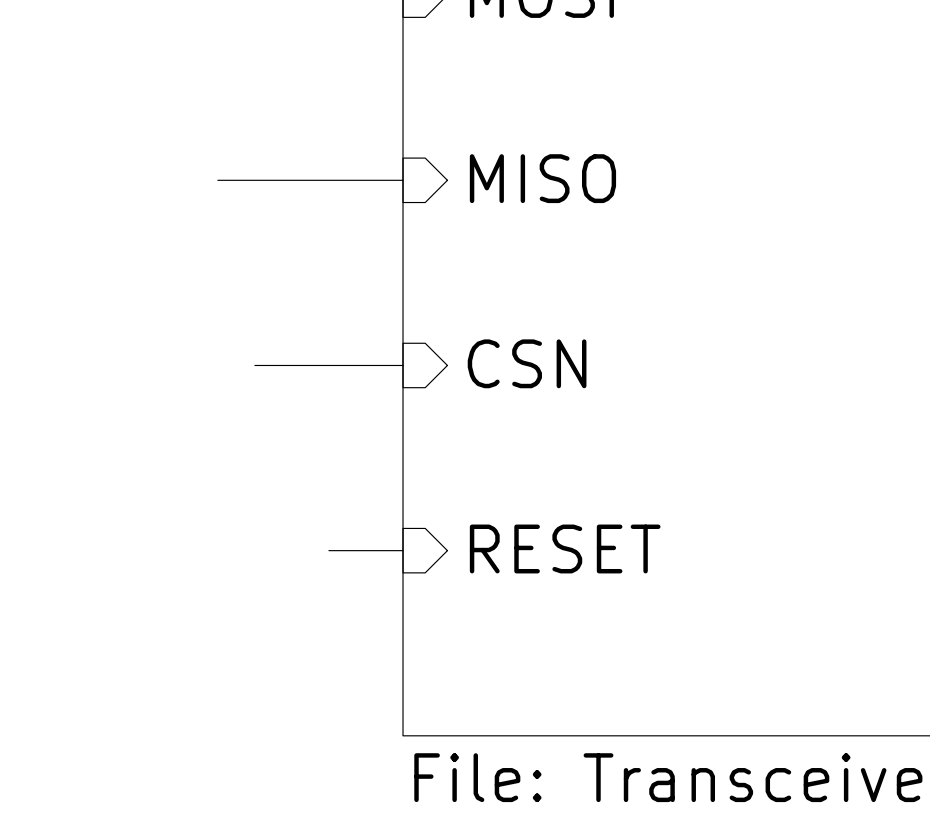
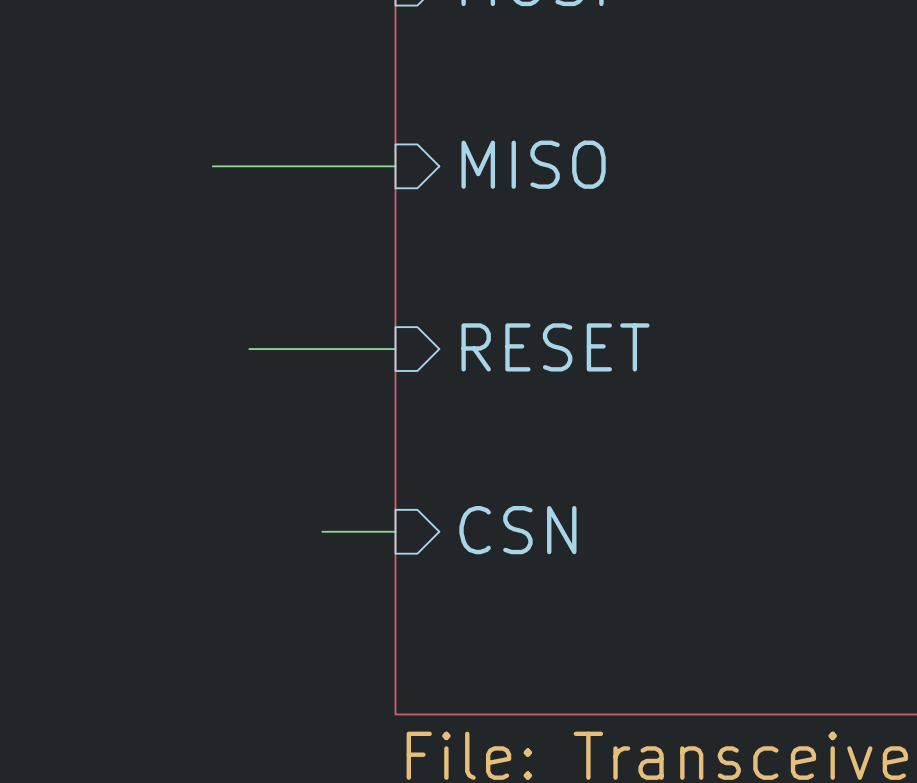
sheet pin: CSN (527, 363) -> RESET (555, 347)
sheet pin: RESET (565, 548) -> CSN (517, 530)

